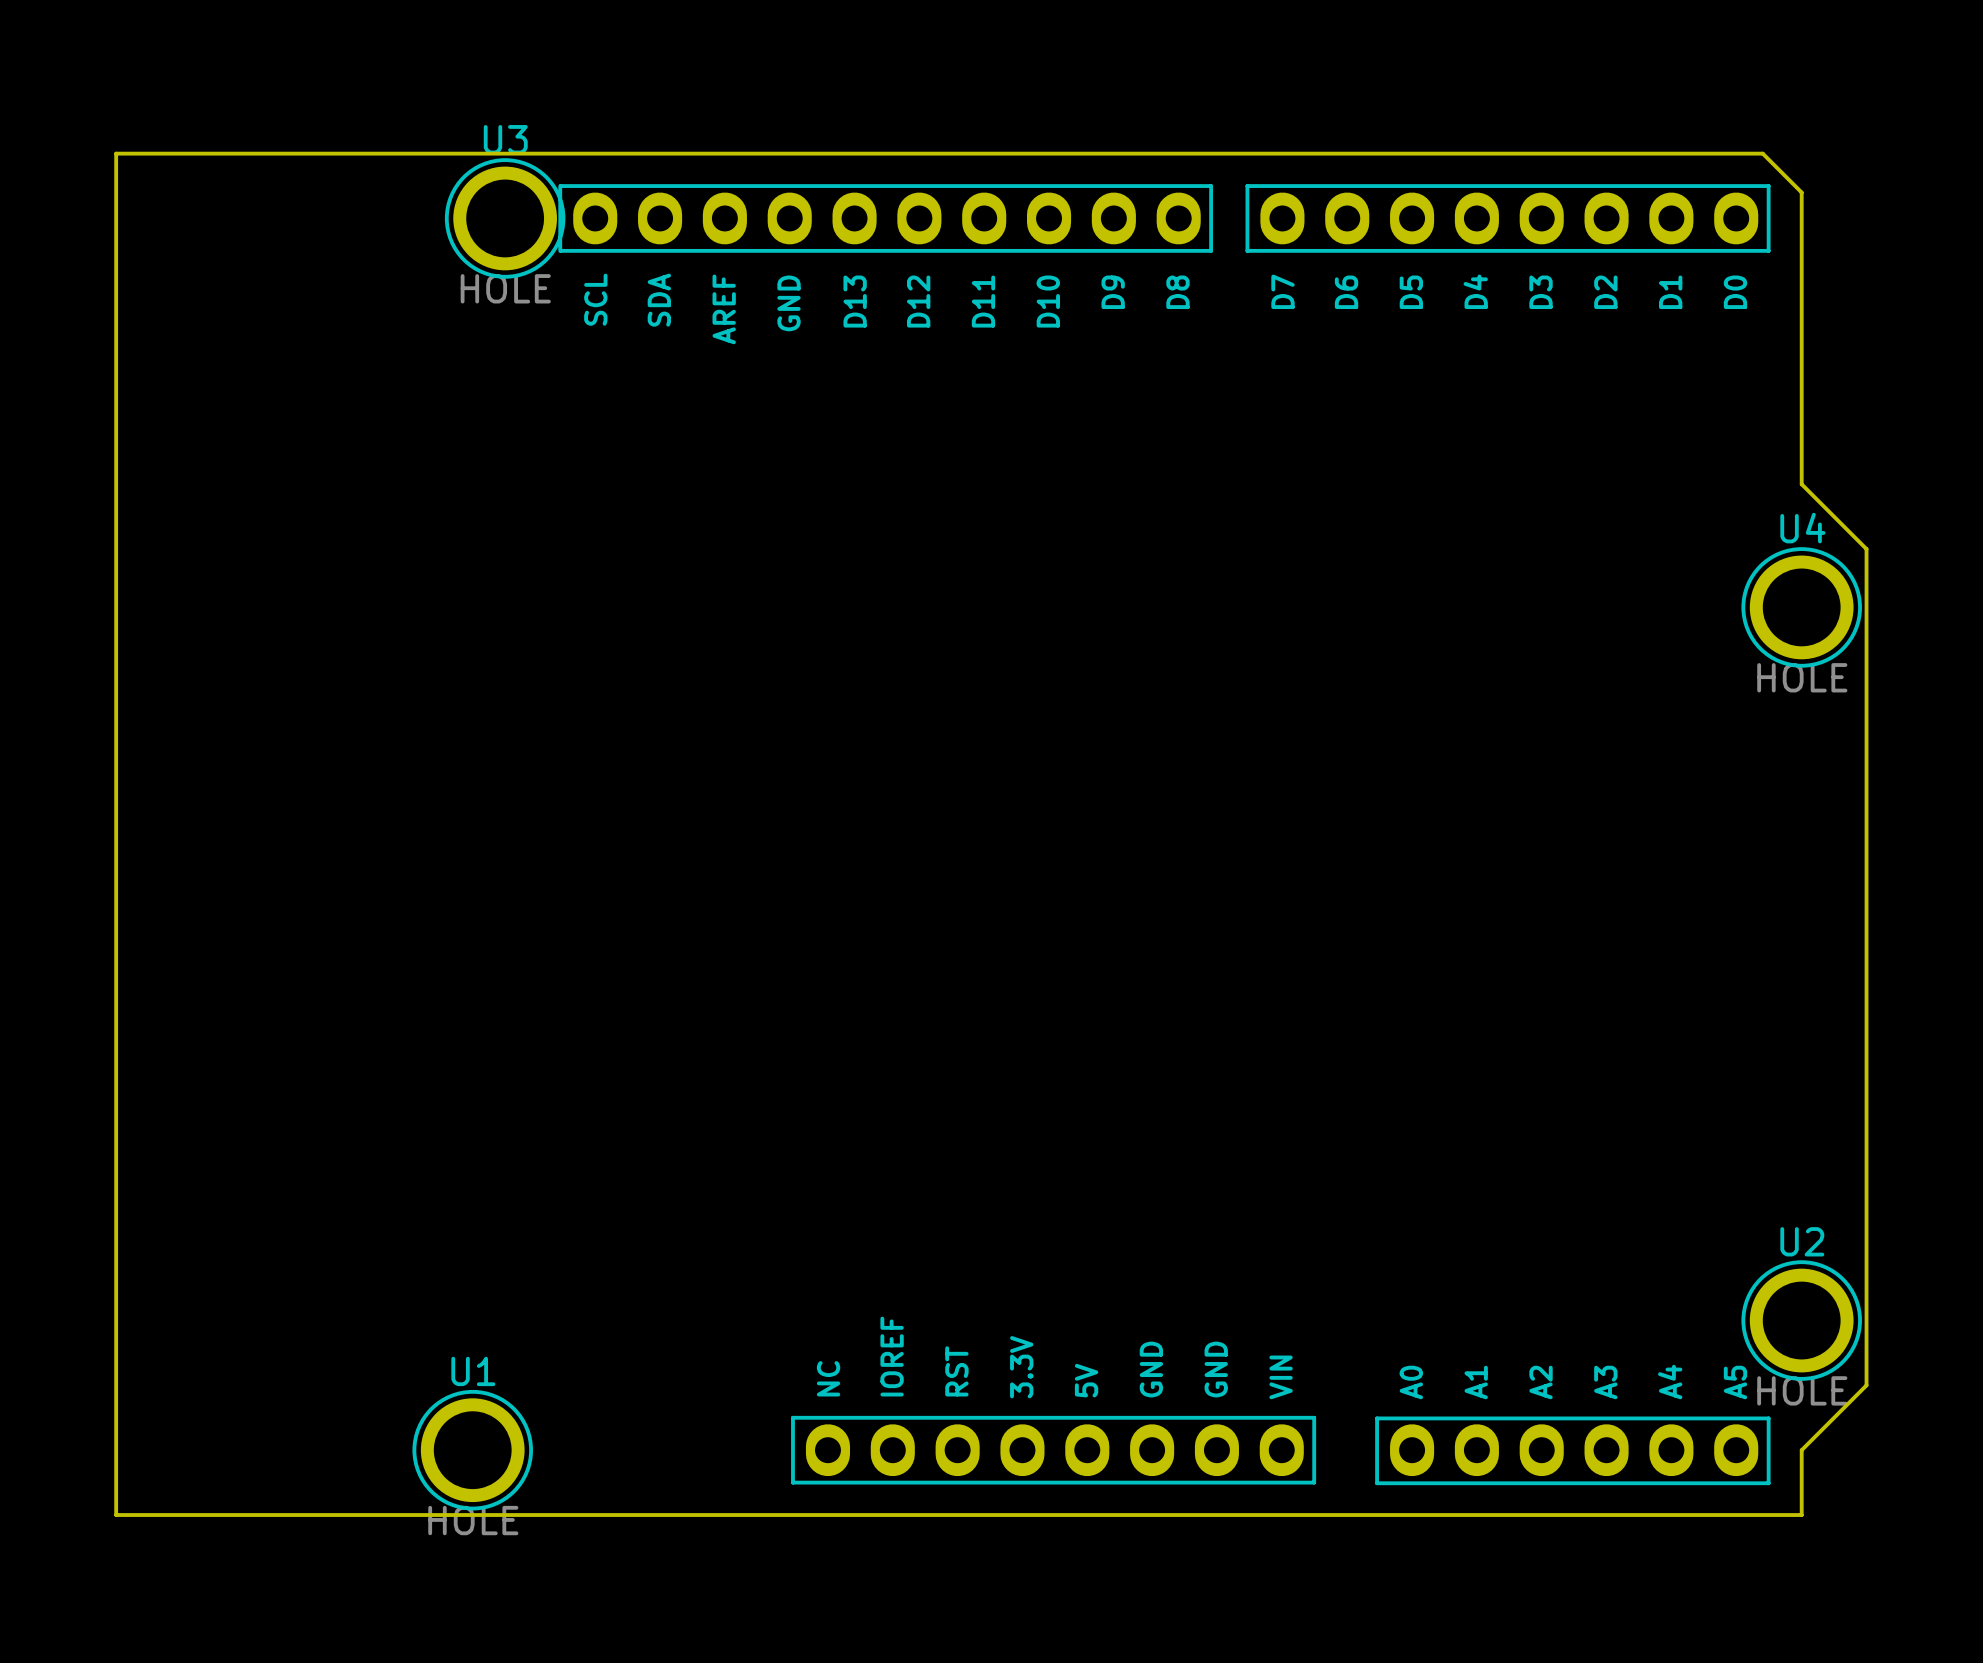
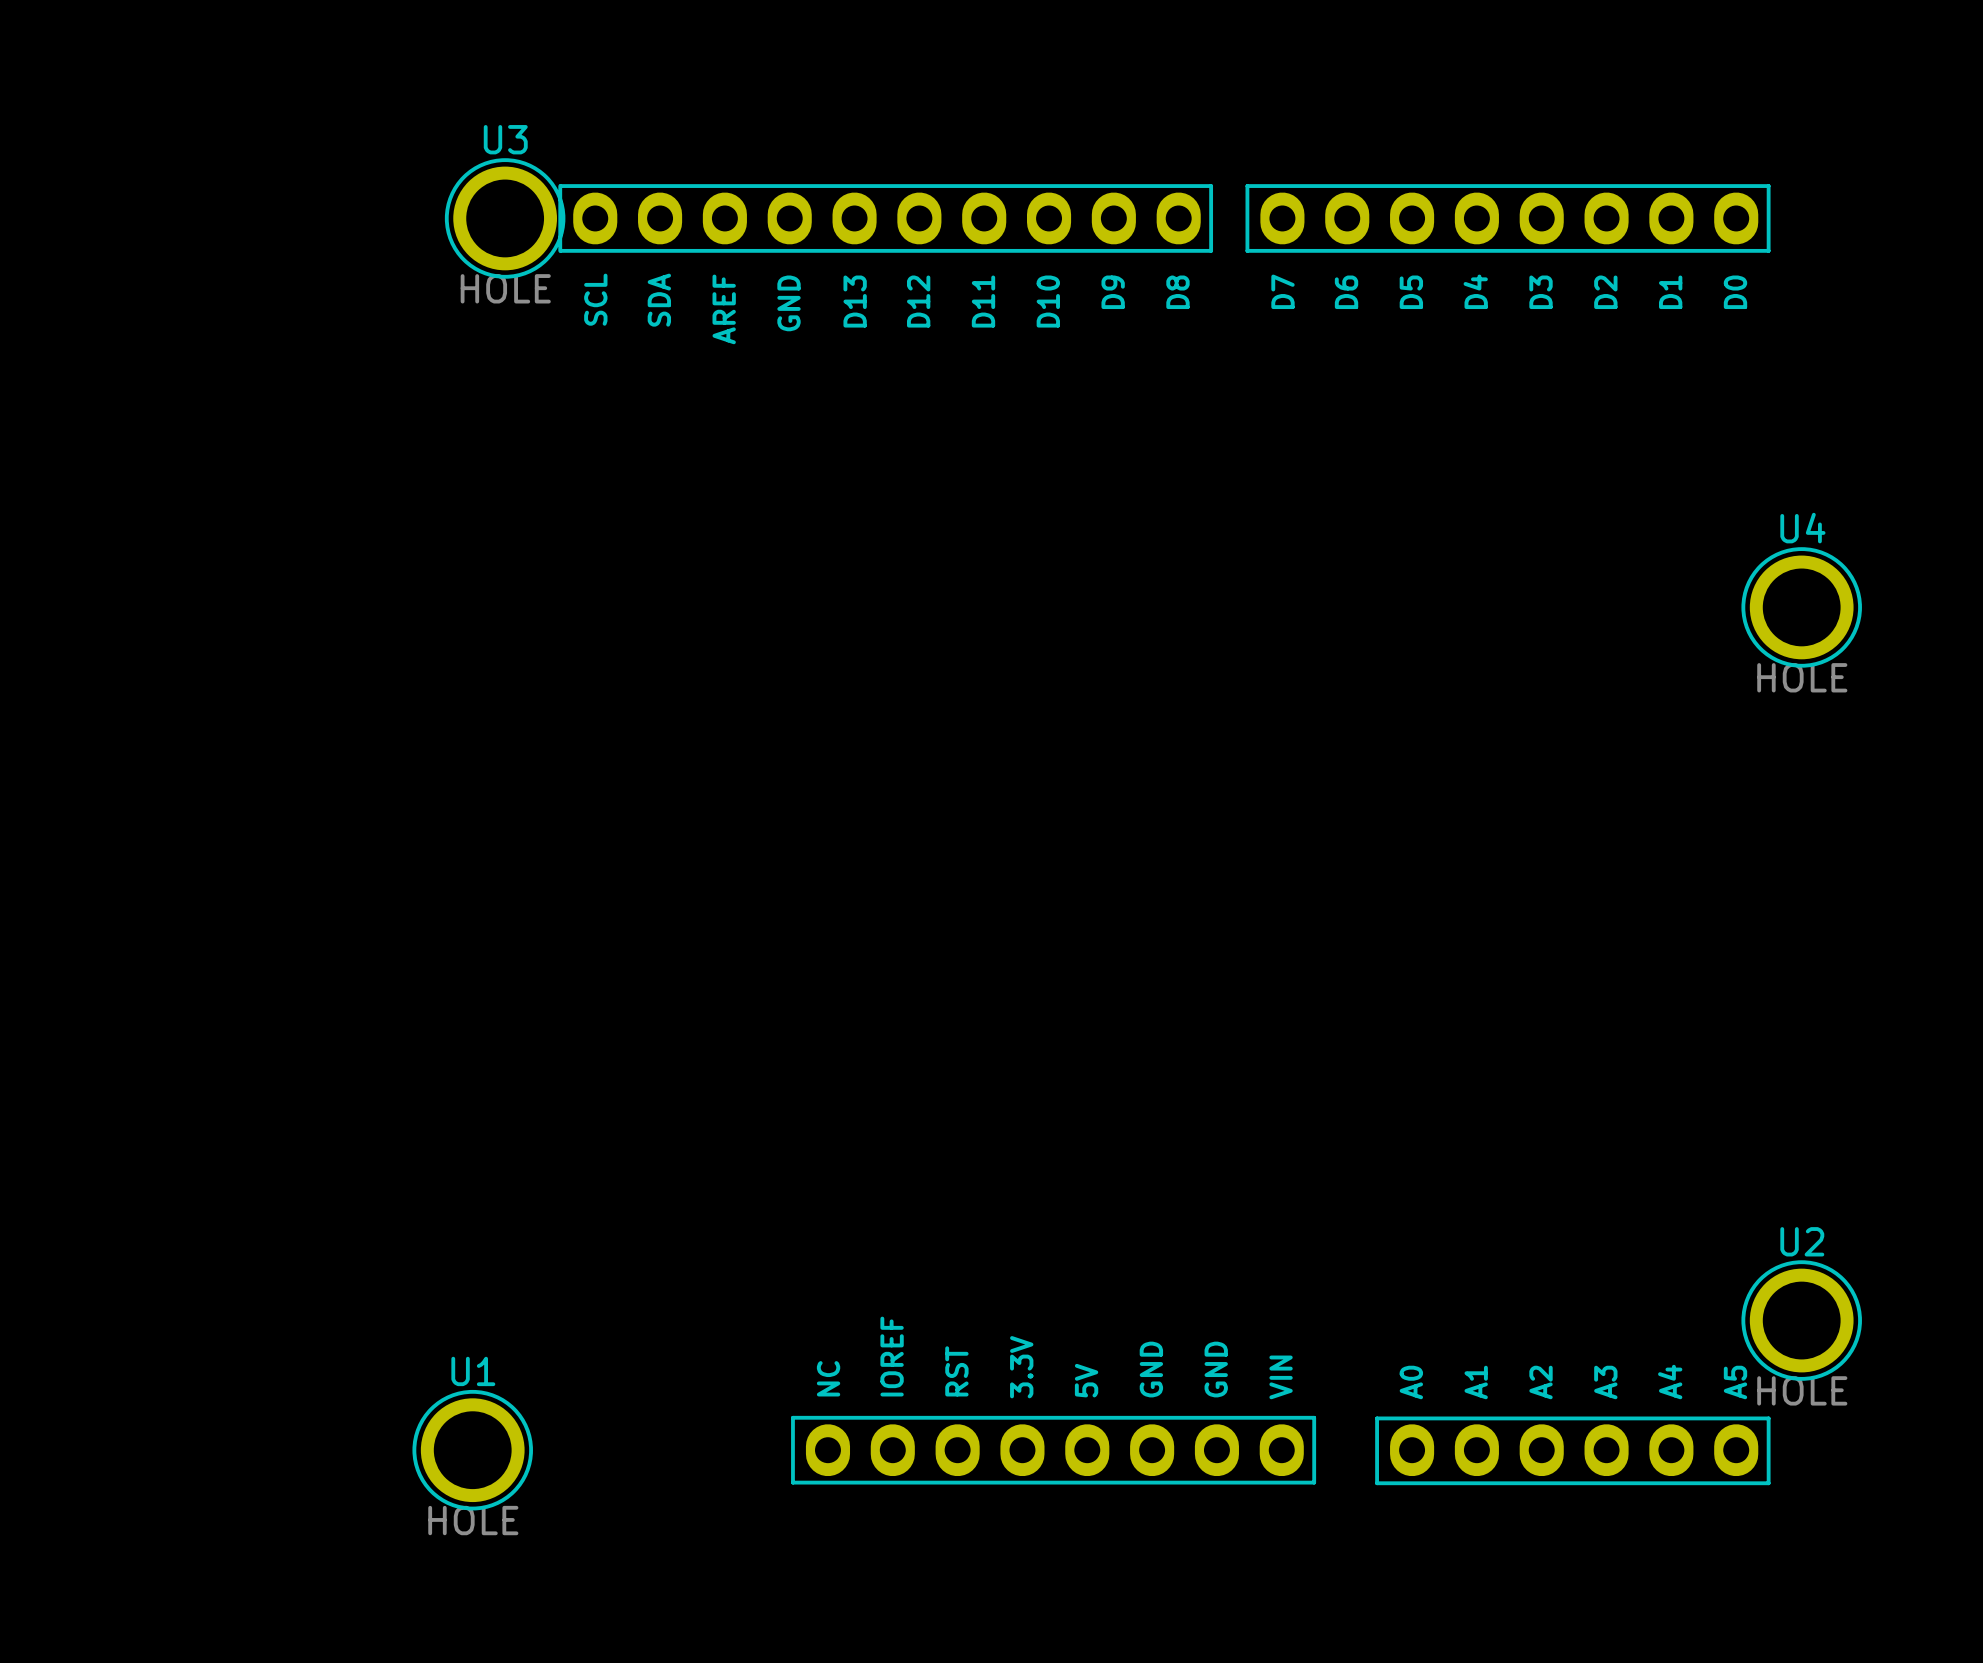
board edge: (116, 153) (116, 1515) (1801, 1515) (1801, 1450) (1866, 1385) (1866, 549) (1801, 484) (1801, 192) (1762, 153) (116, 153) -> none

